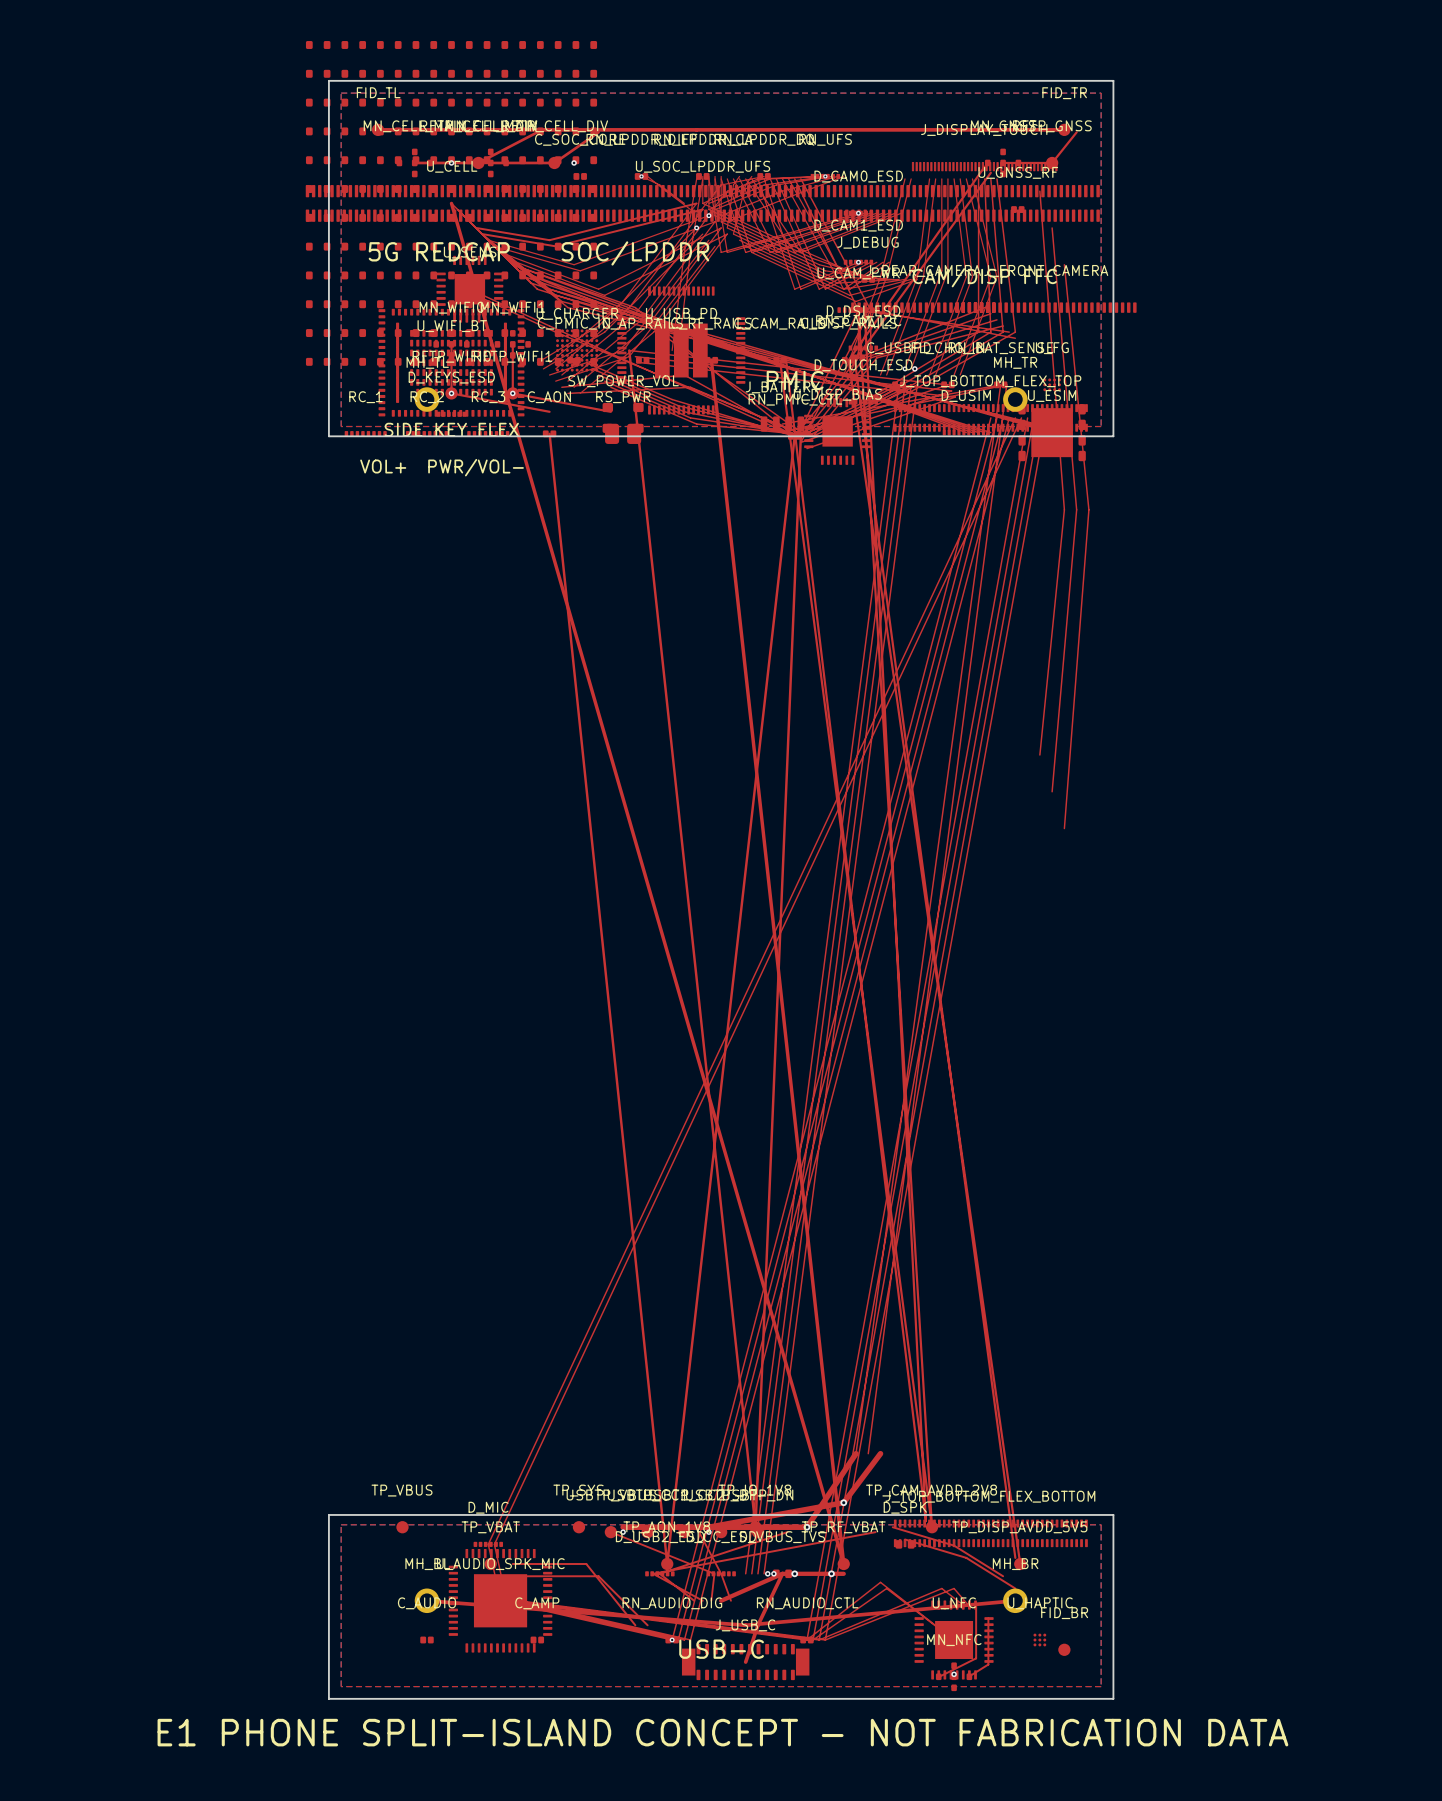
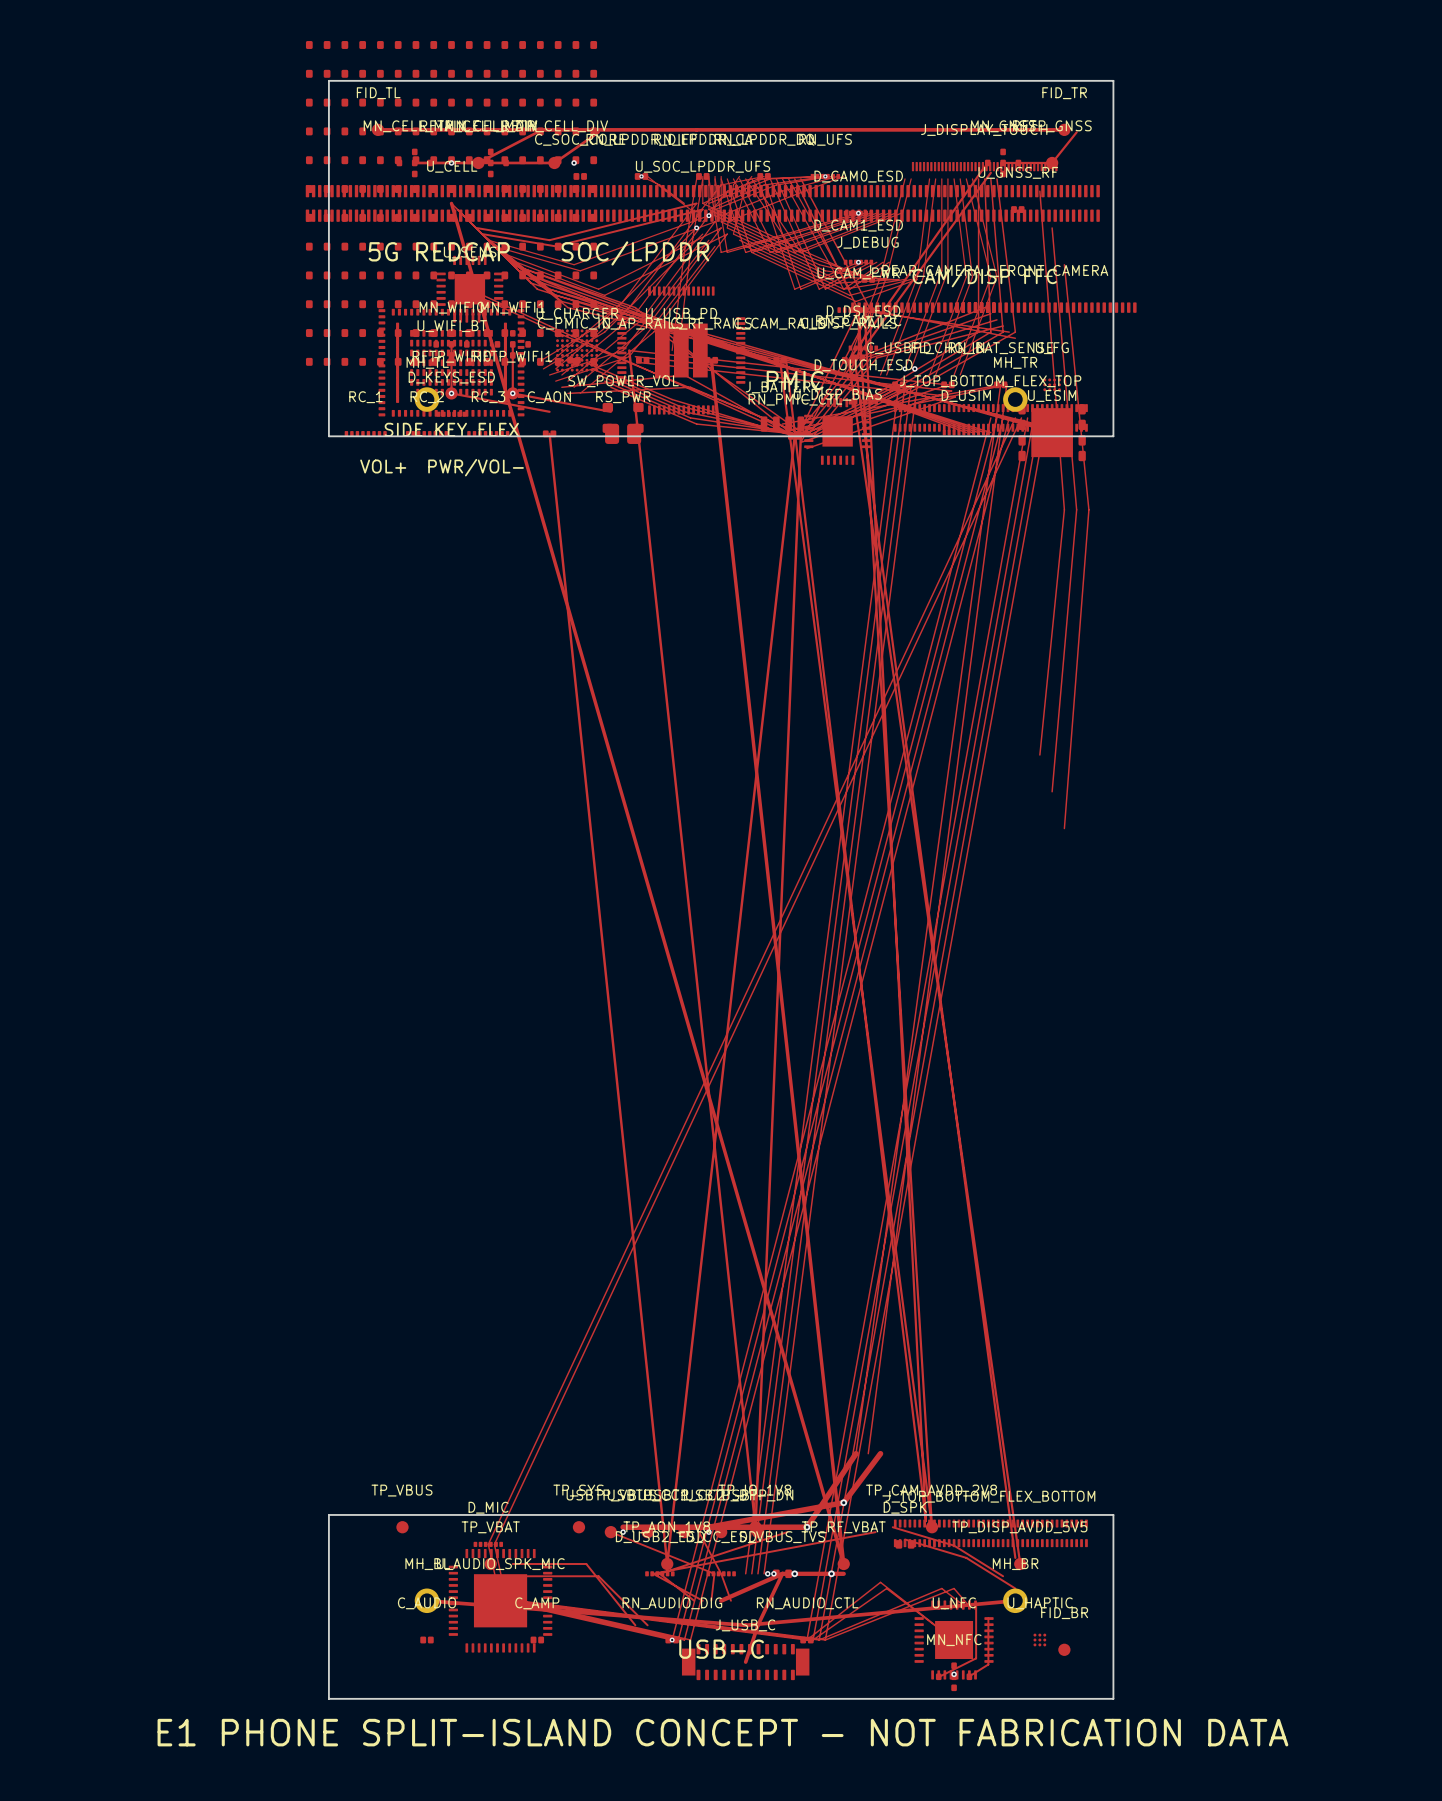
top zone outline: (341, 93) (1101, 93) (1101, 426) (341, 426) (341, 93) -> none
top zone outline: (341, 1524) (341, 1686) (1101, 1686) (1101, 1524) (341, 1524) -> none

